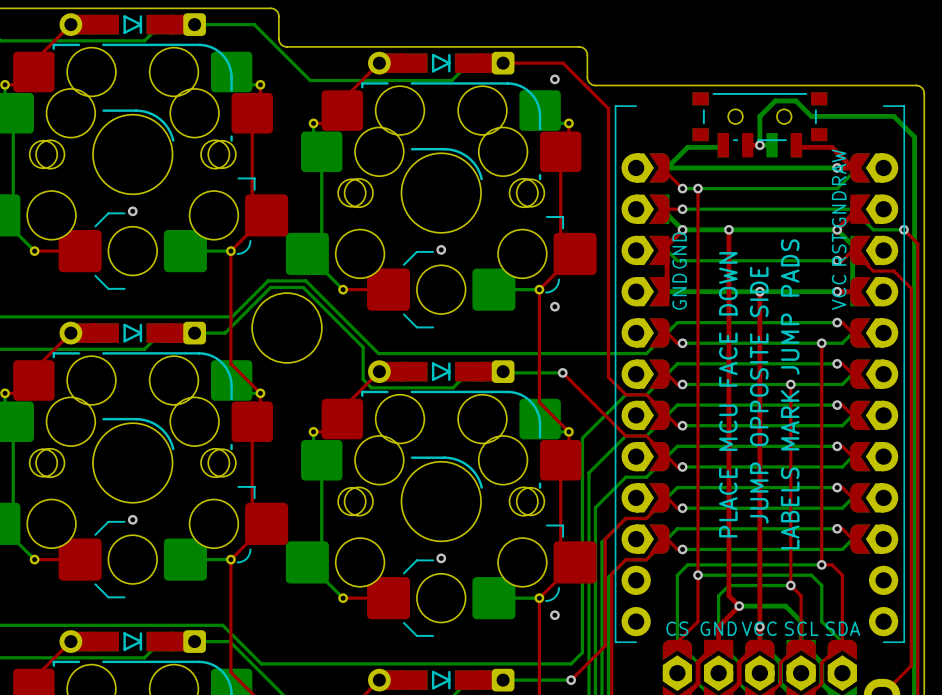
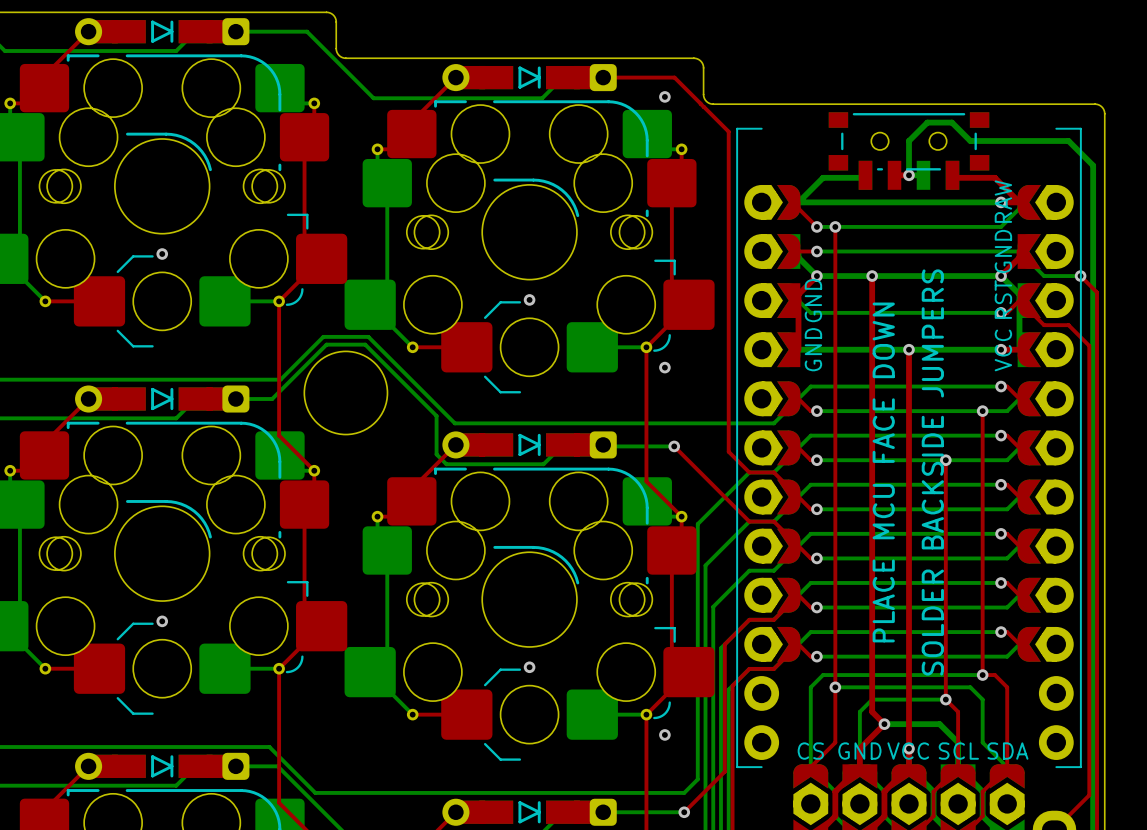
part footprint: [614, 105, 906, 644] -> [736, 127, 1082, 769]

